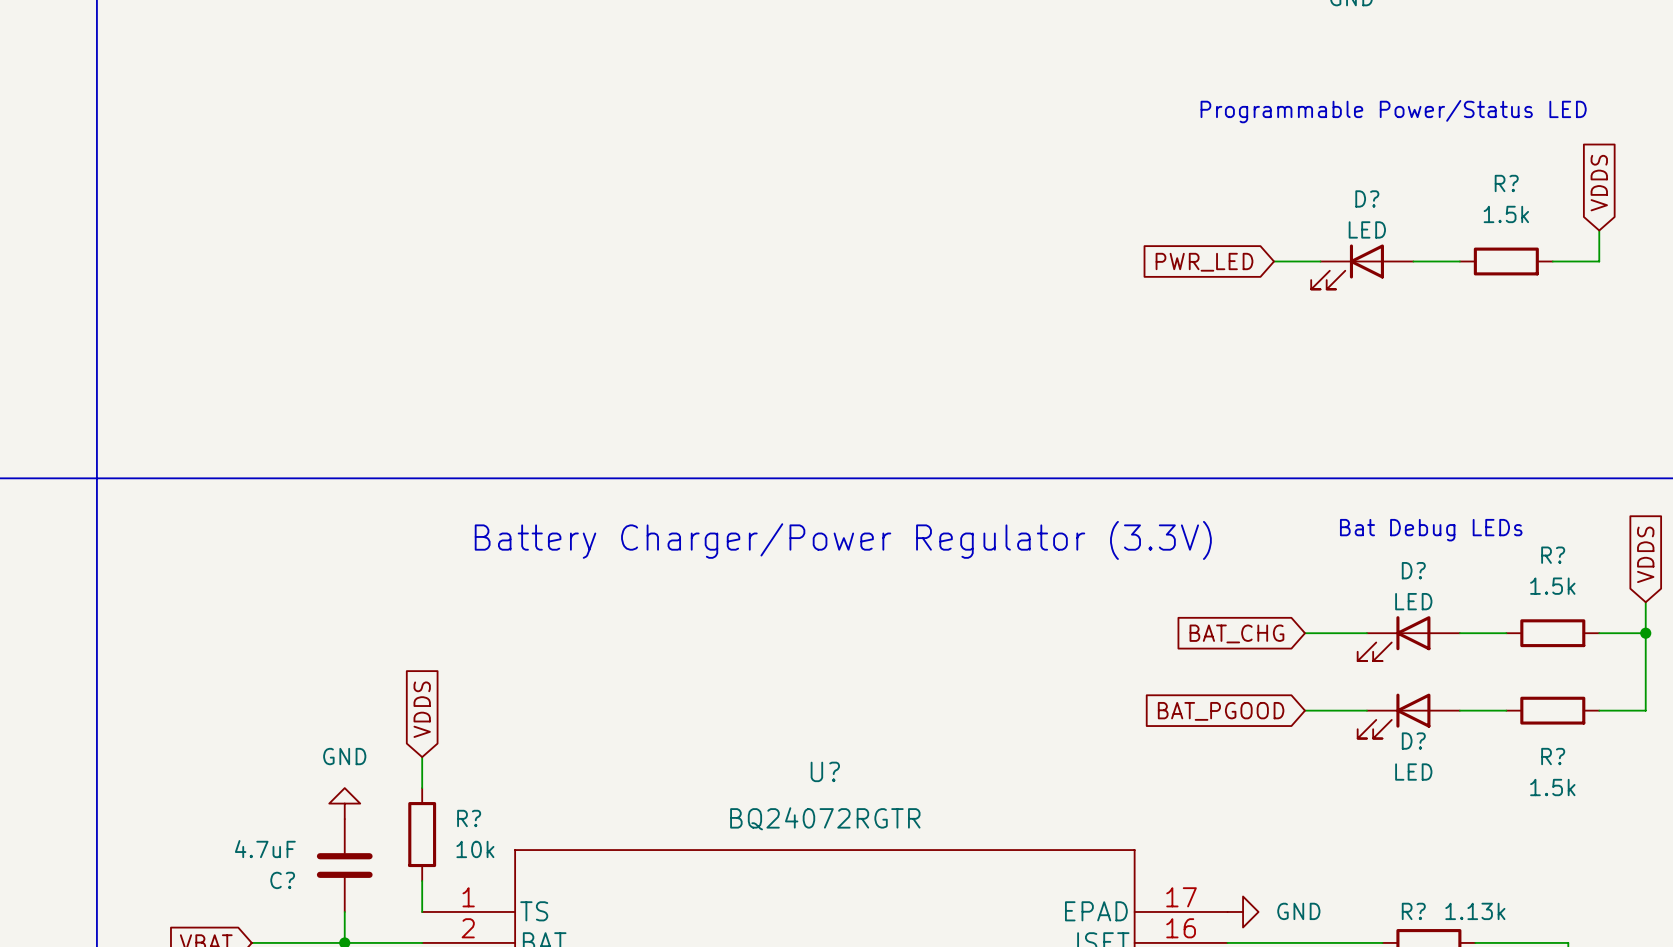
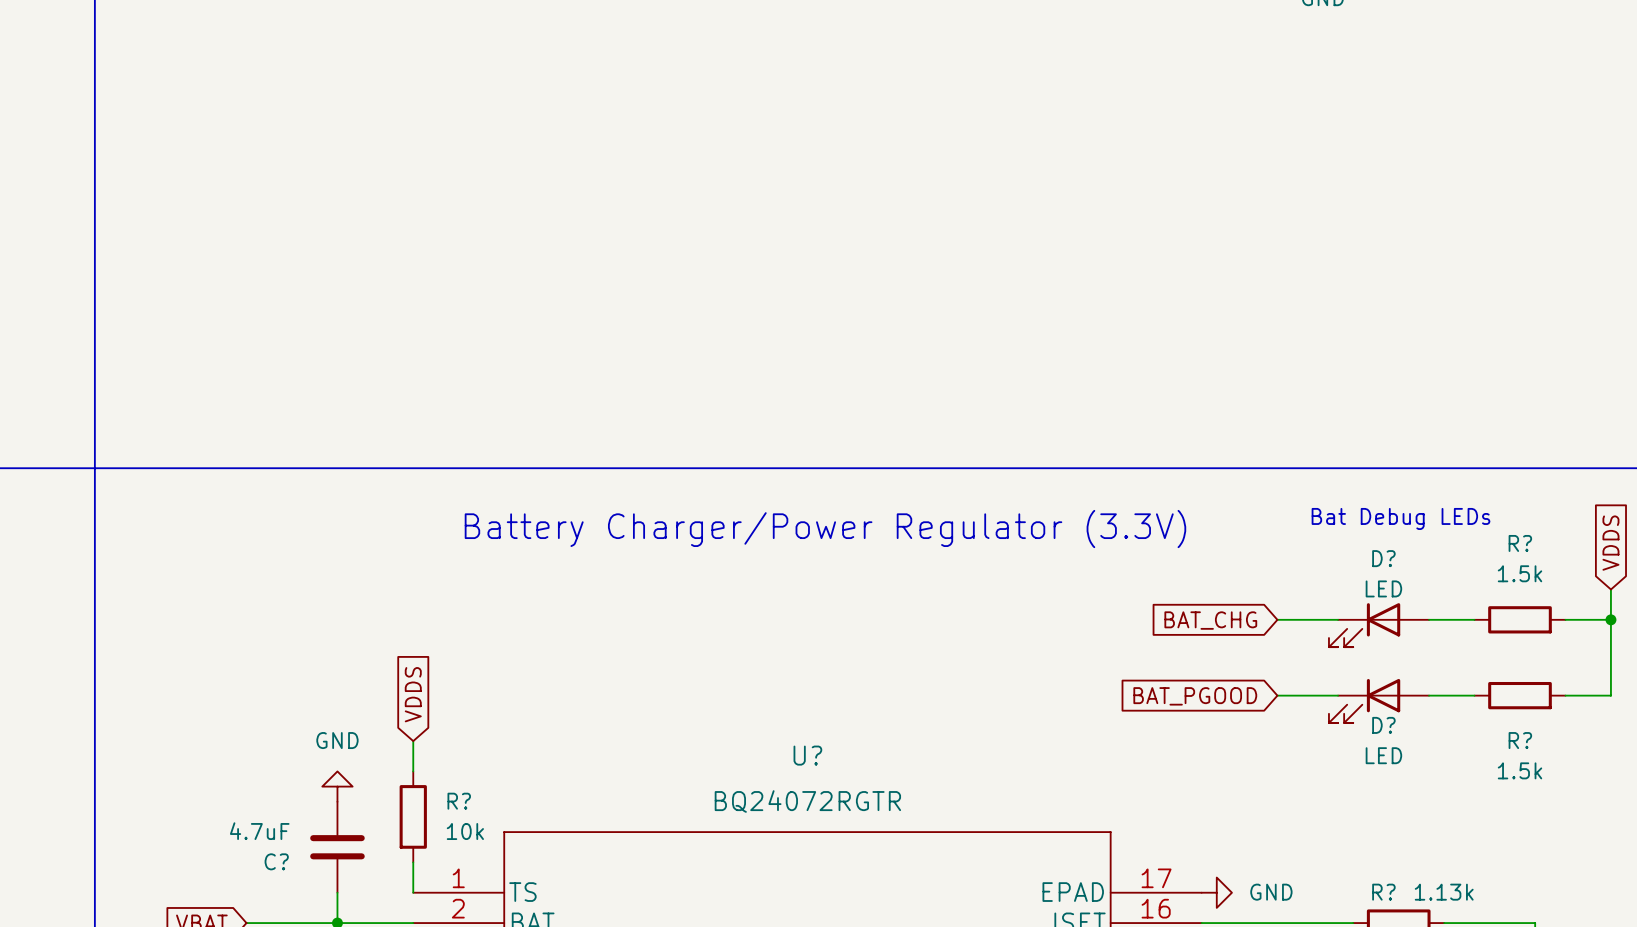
text: Programmable Power/Status LED (1393, 111) -> none
global label: VDDS (1599, 183) -> none
wire: (1599, 230) (1599, 261) (1552, 261) -> none
wire: (1274, 261) (1320, 261) -> none
wire: (1413, 261) (1459, 261) -> none
R?: 1.5k (1506, 261) -> none
global label: PWR_LED (1204, 262) -> none
D?: LED (1362, 266) -> none

